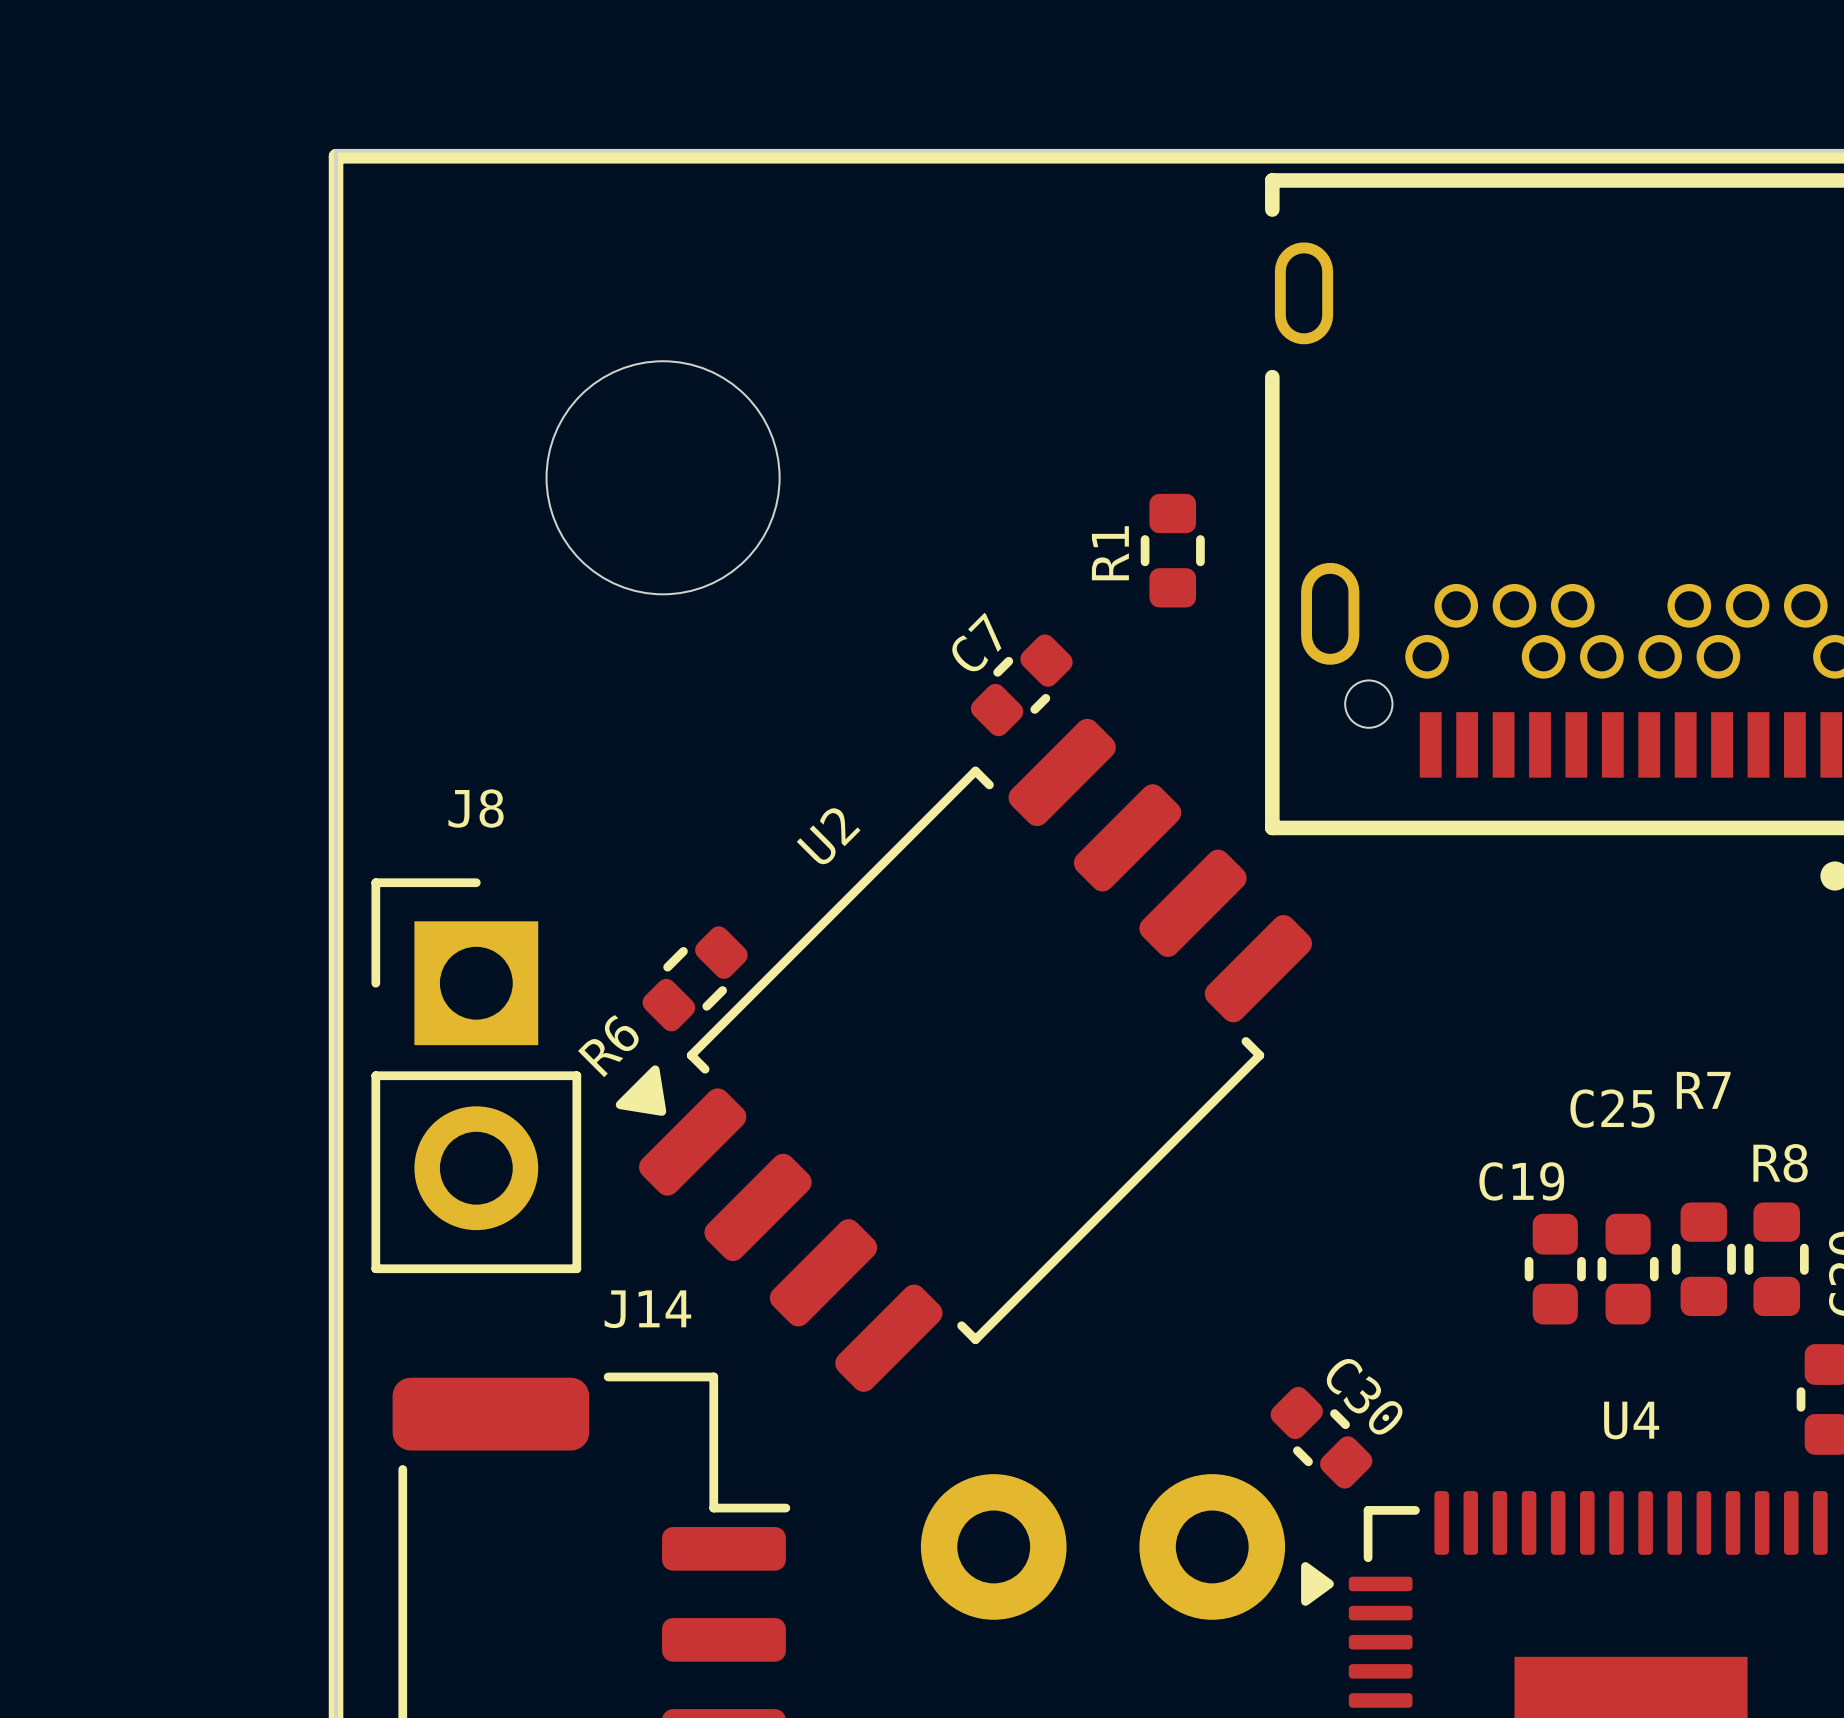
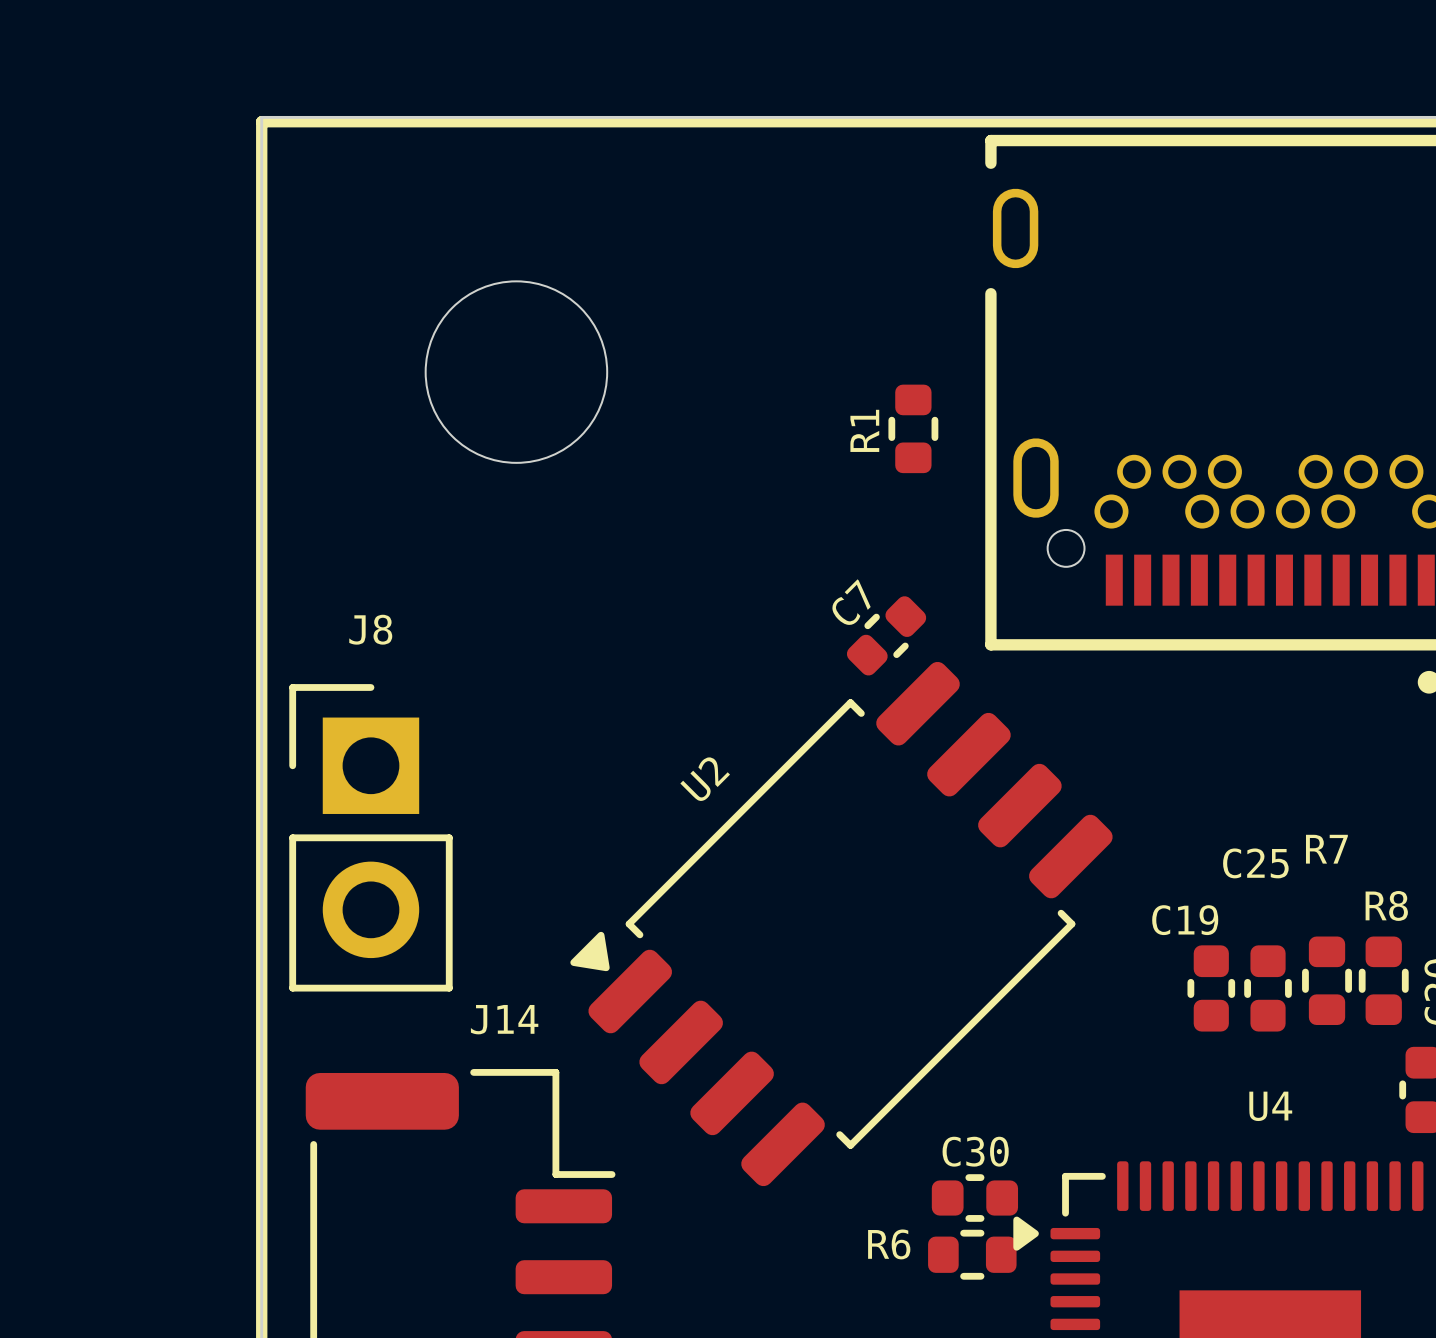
C7 position: (1021, 685) -> (886, 635)
U2 name position: U2 (828, 836) -> U2 (705, 779)
R6 rotation: 0° (695, 978) -> 45° clockwise (972, 1254)
R6 position: (695, 978) -> (972, 1254)
U2 position: (963, 1055) -> (841, 924)
C30 rotation: 0° (1321, 1437) -> 45° counterclockwise (974, 1198)
C30 position: (1321, 1437) -> (974, 1198)
part: (993, 1546) -> none
part: (1212, 1546) -> none

